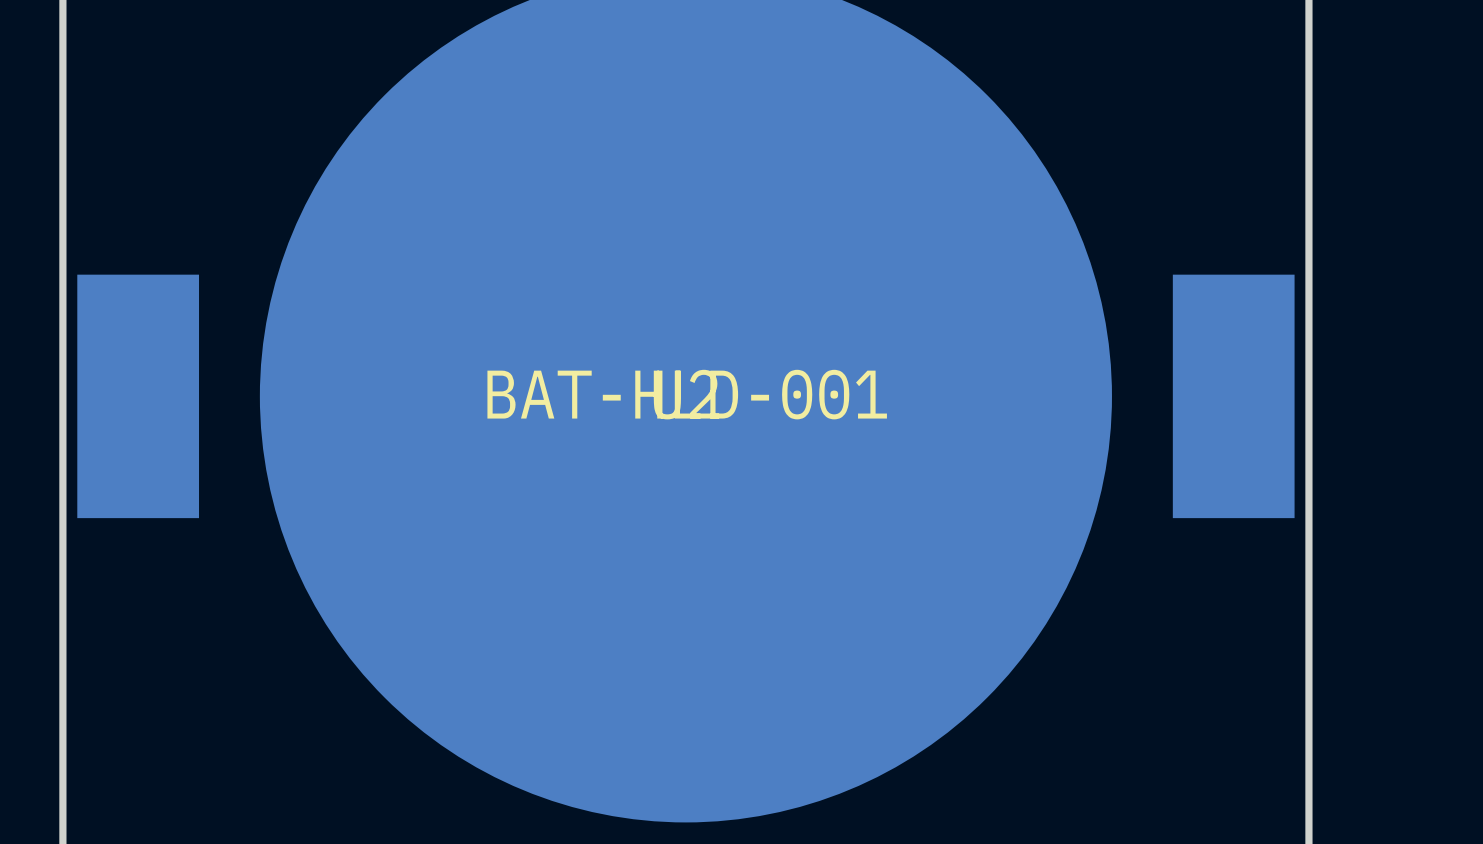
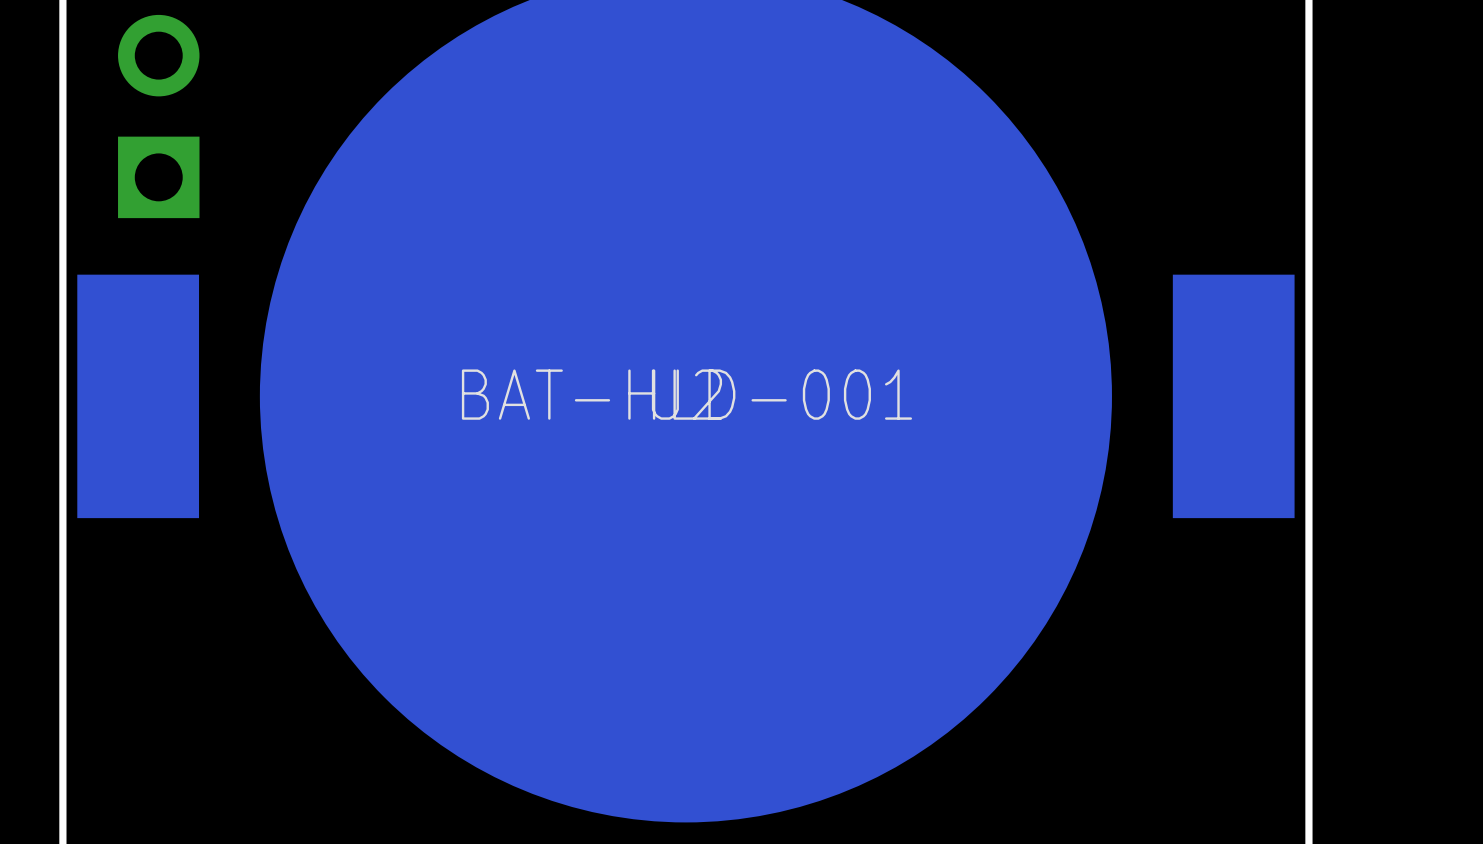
part: none -> (158, 116)

